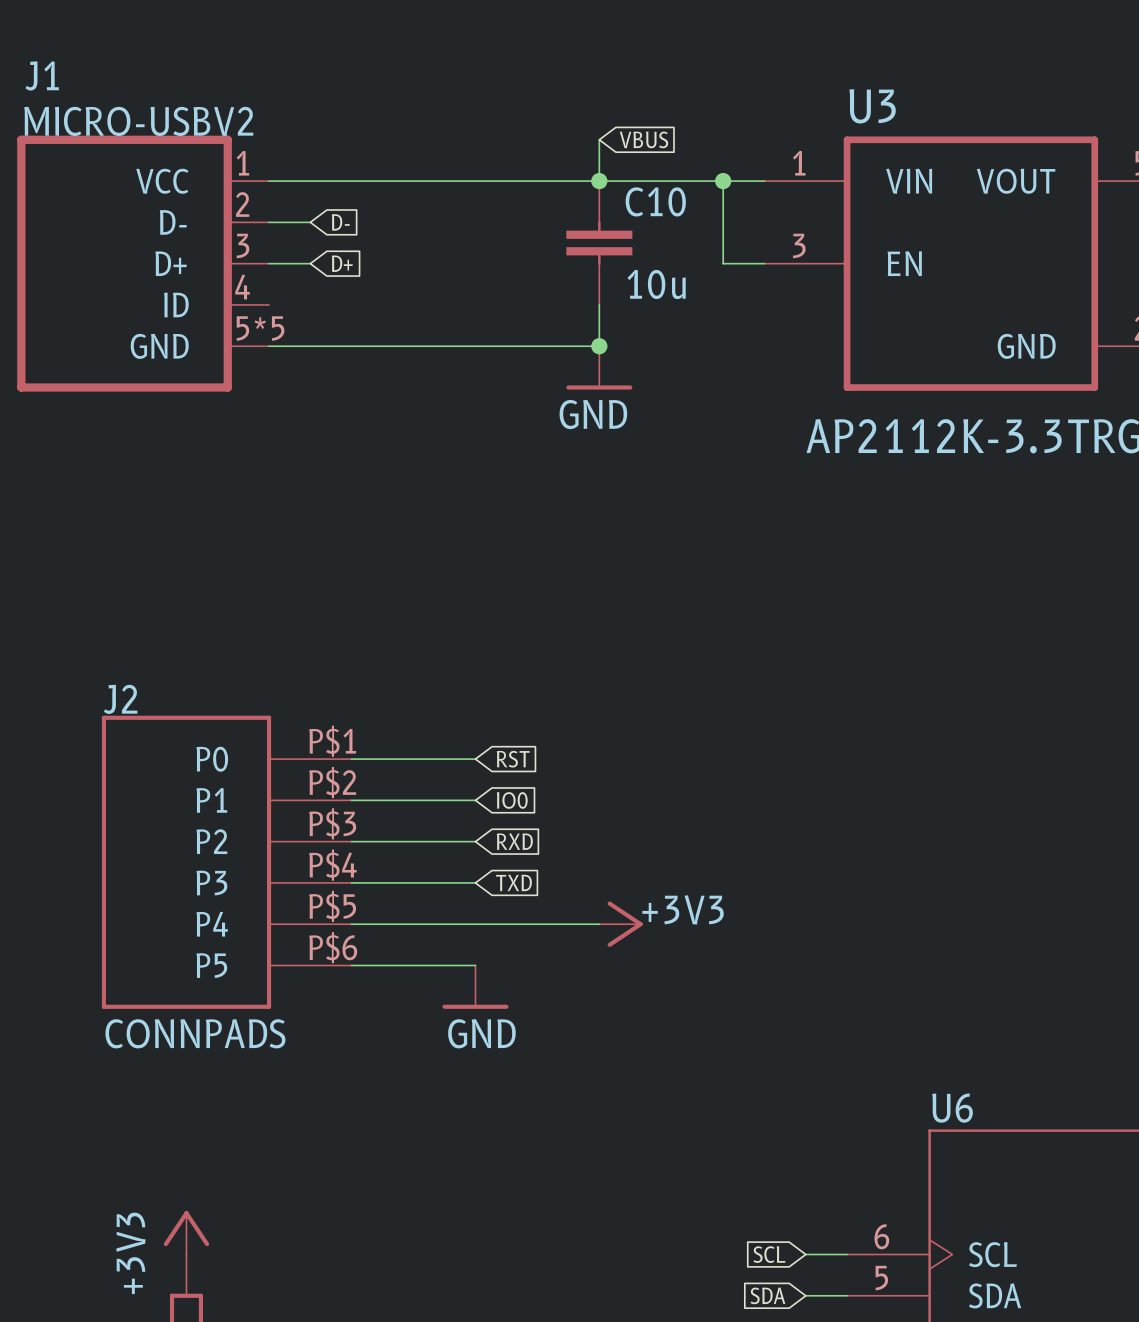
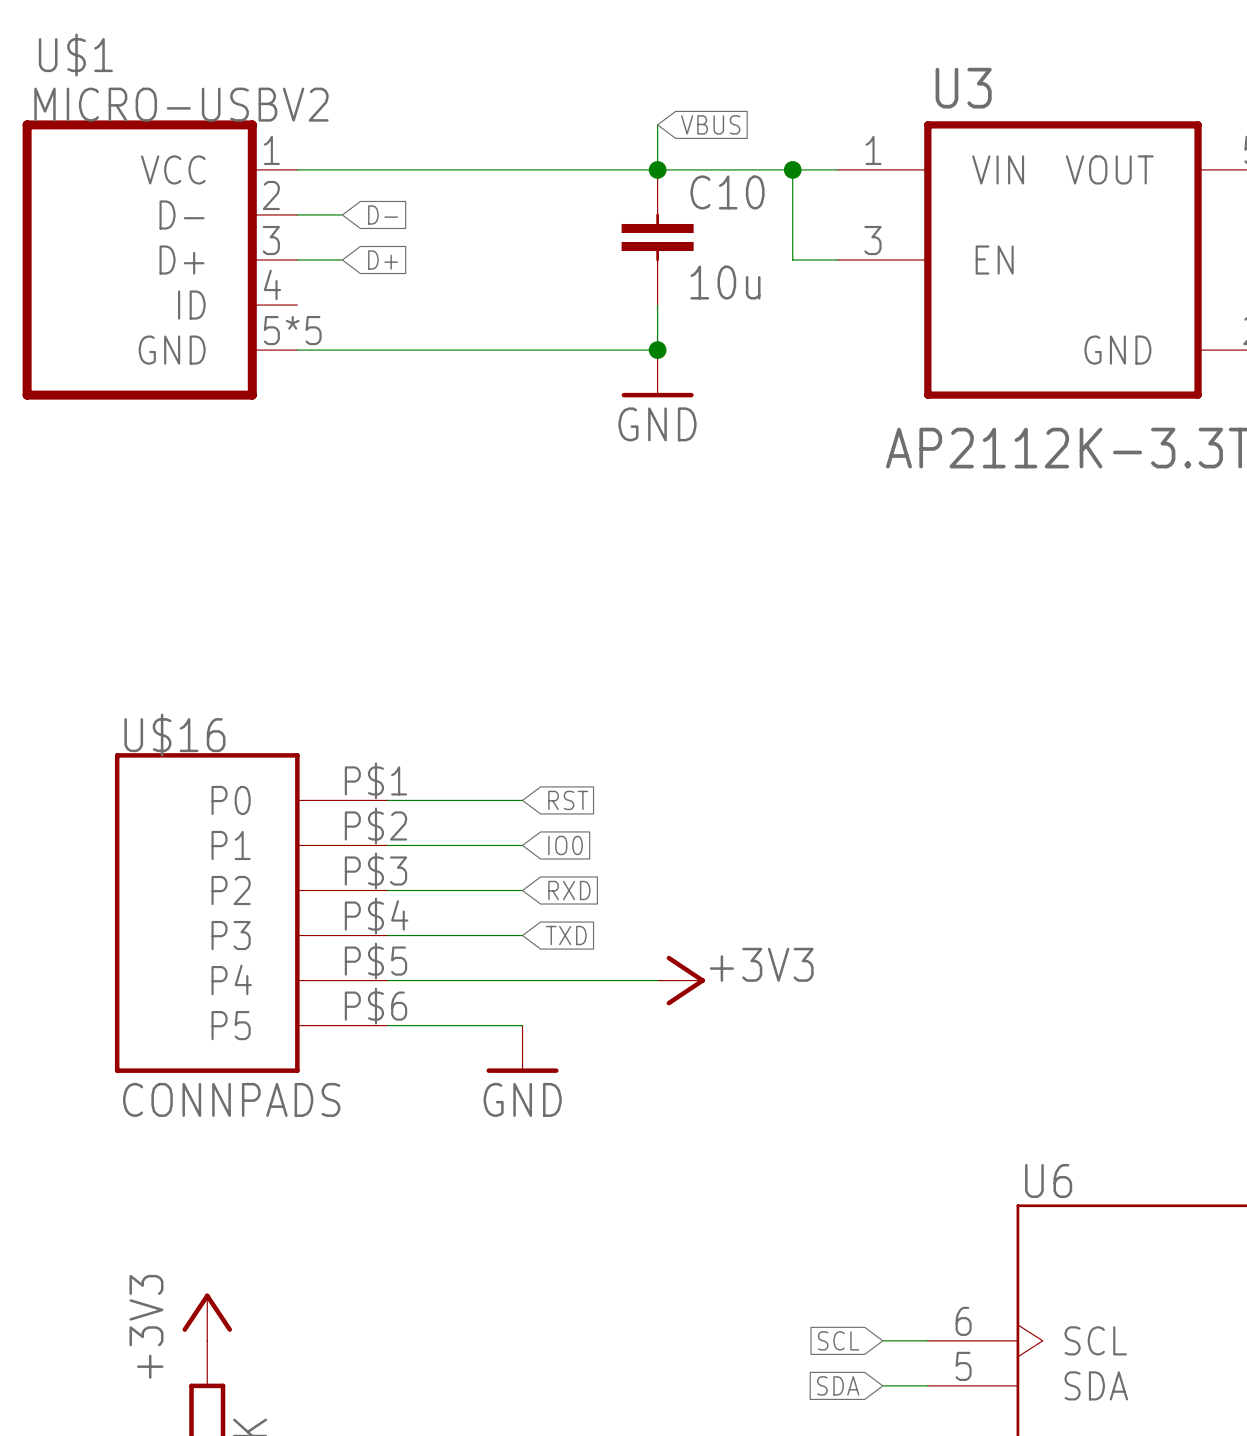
J1 name: J1 (42, 75) -> U$1 (75, 55)
J2 name: J2 (120, 699) -> U$16 (174, 735)

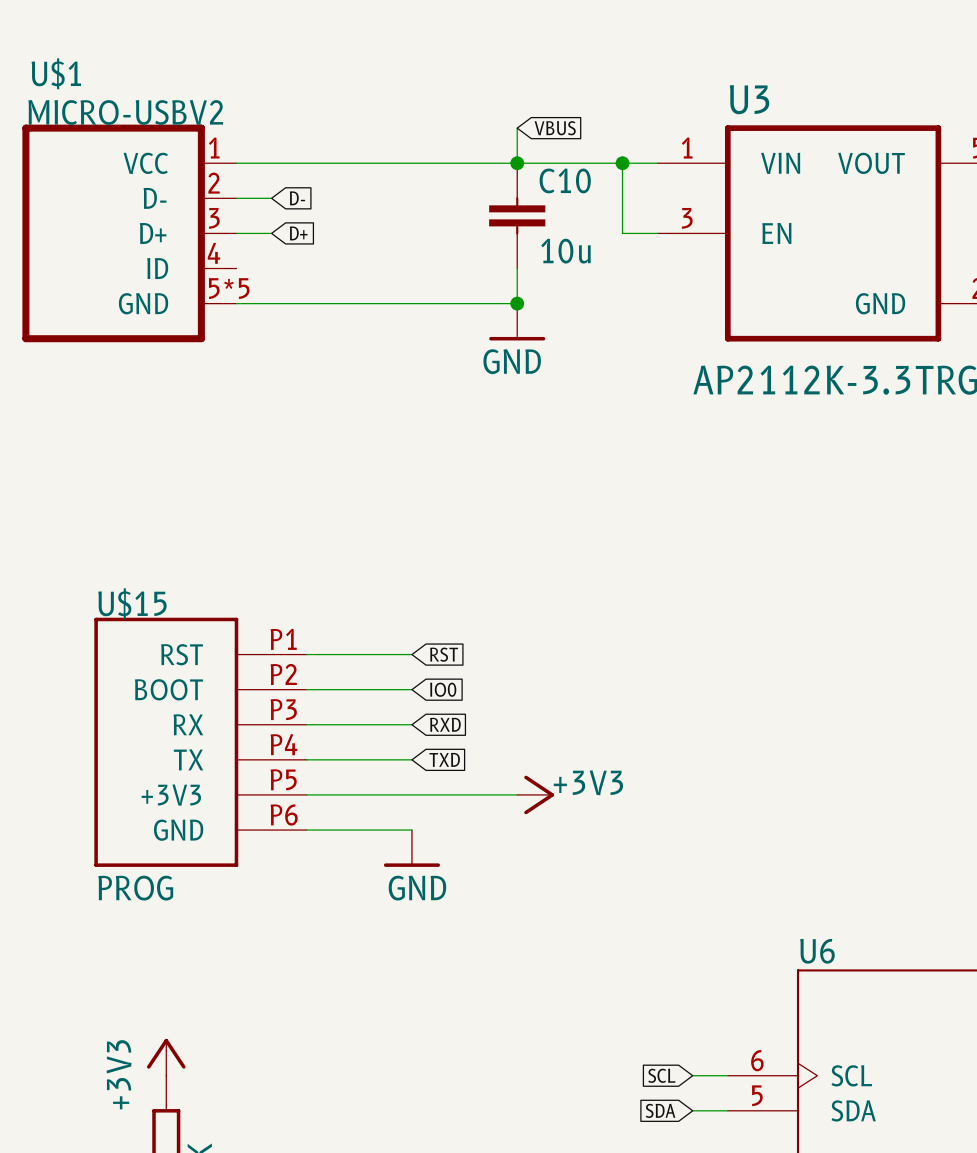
U$16 name: U$16 (174, 735) -> U$15 (132, 603)
U$16 symbol: [114, 753, 388, 1073] -> [94, 617, 307, 867]
U$16 value: CONNPADS (231, 1099) -> PROG (135, 888)

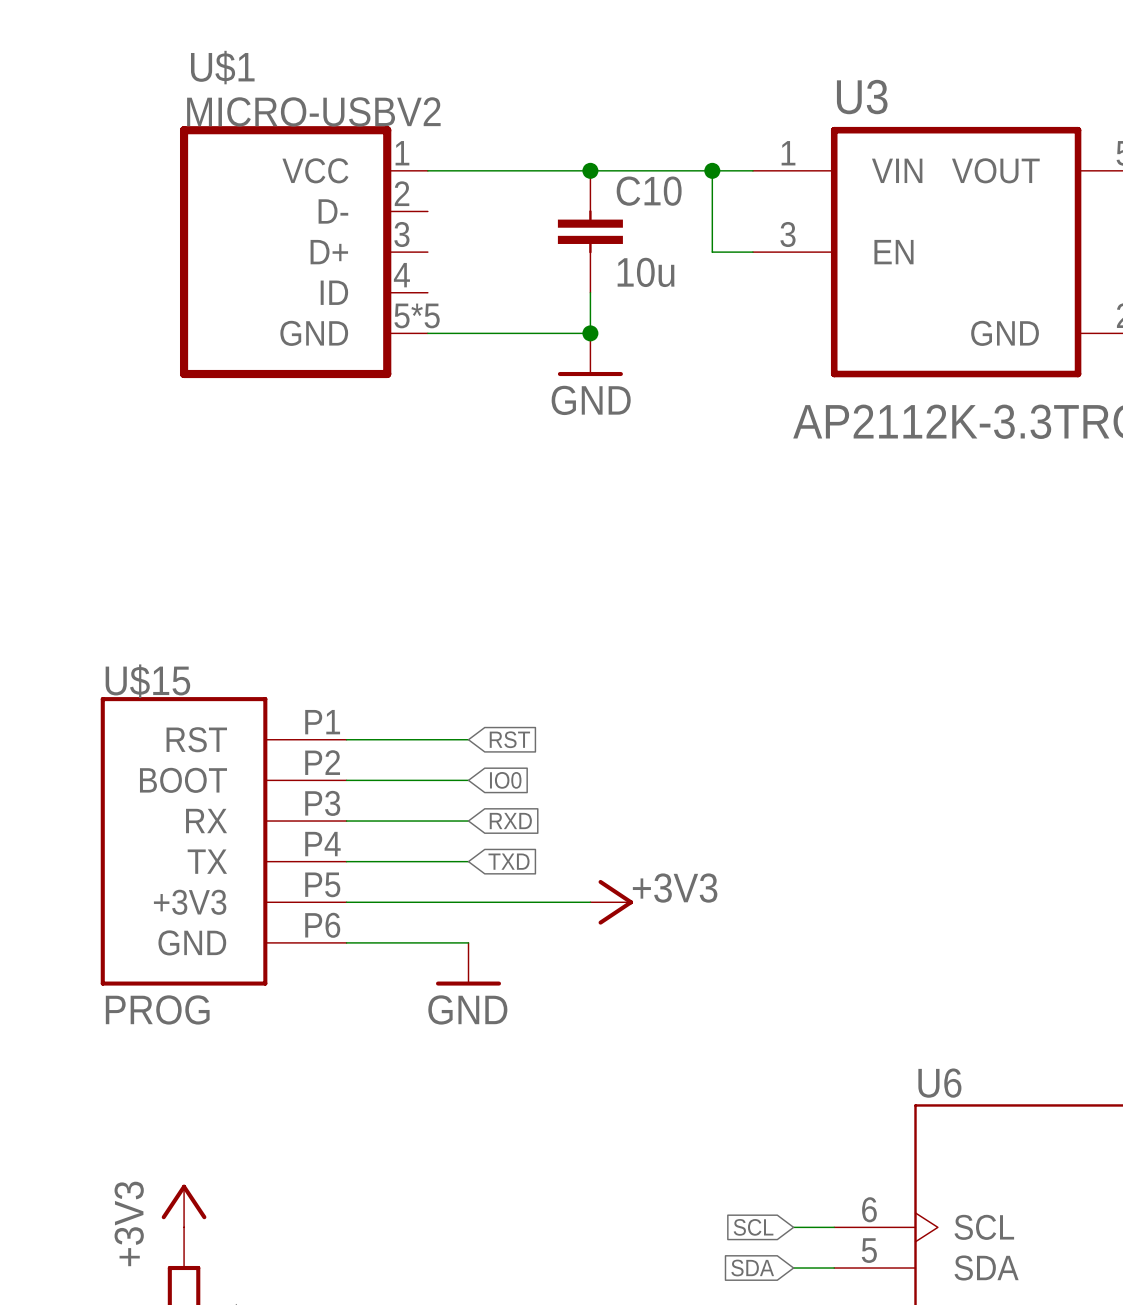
wire: (517, 128) (517, 163) -> none
global label: VBUS (555, 128) -> none
wire: (236, 163) (376, 163) -> none
wire: (236, 198) (271, 198) -> none
global label: D- (297, 198) -> none
U$1 position: (129, 233) -> (303, 252)
wire: (236, 233) (271, 233) -> none
global label: D+ (298, 233) -> none
wire: (236, 303) (376, 303) -> none

